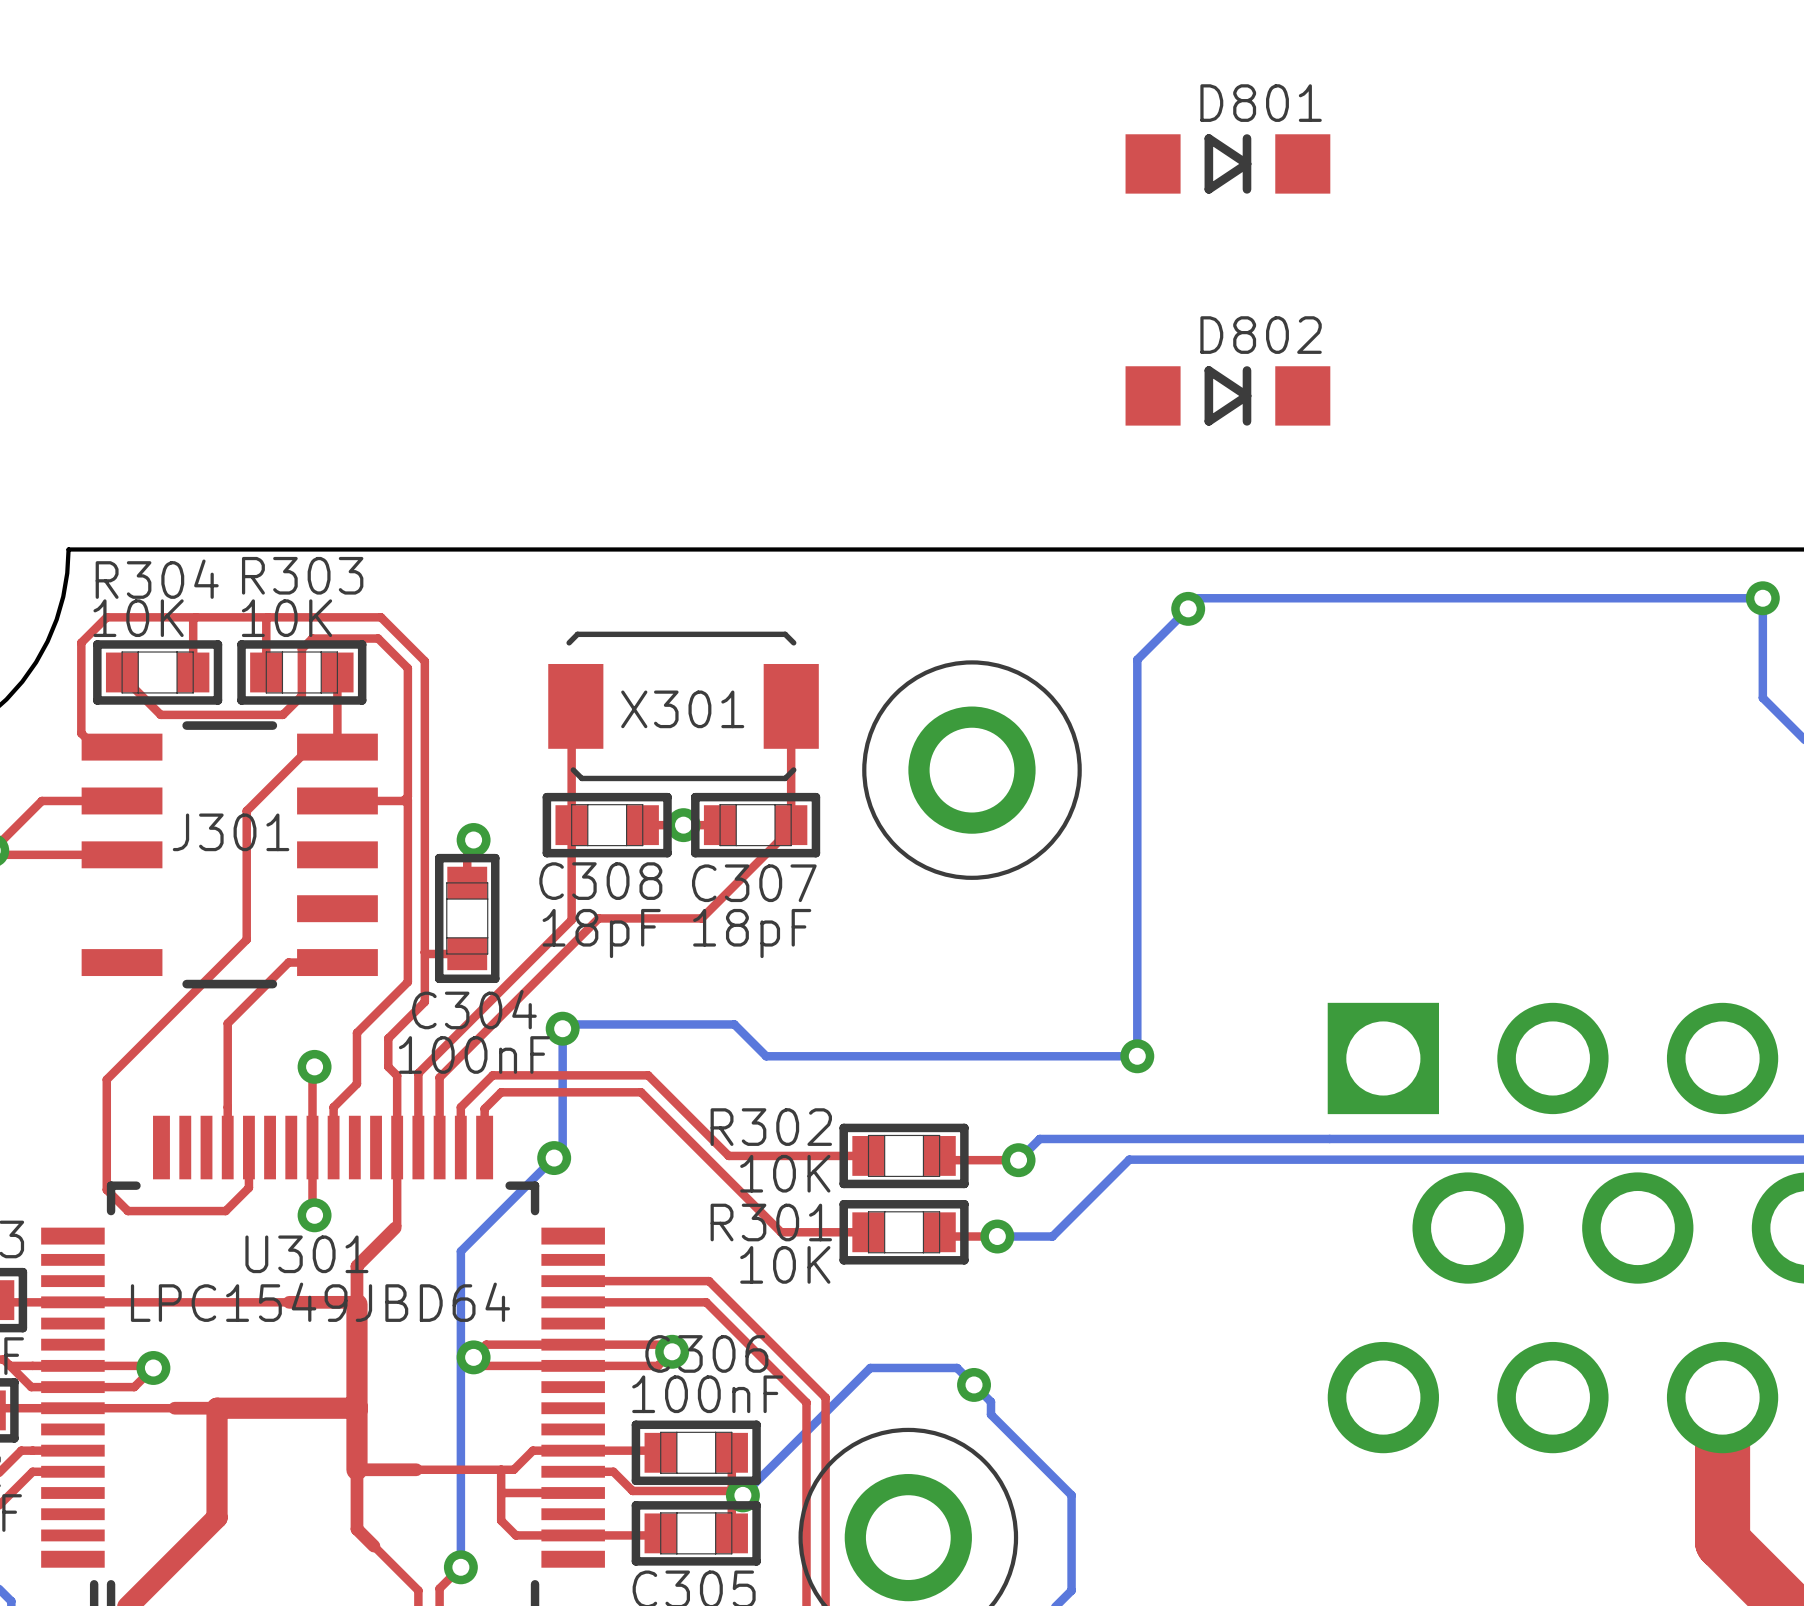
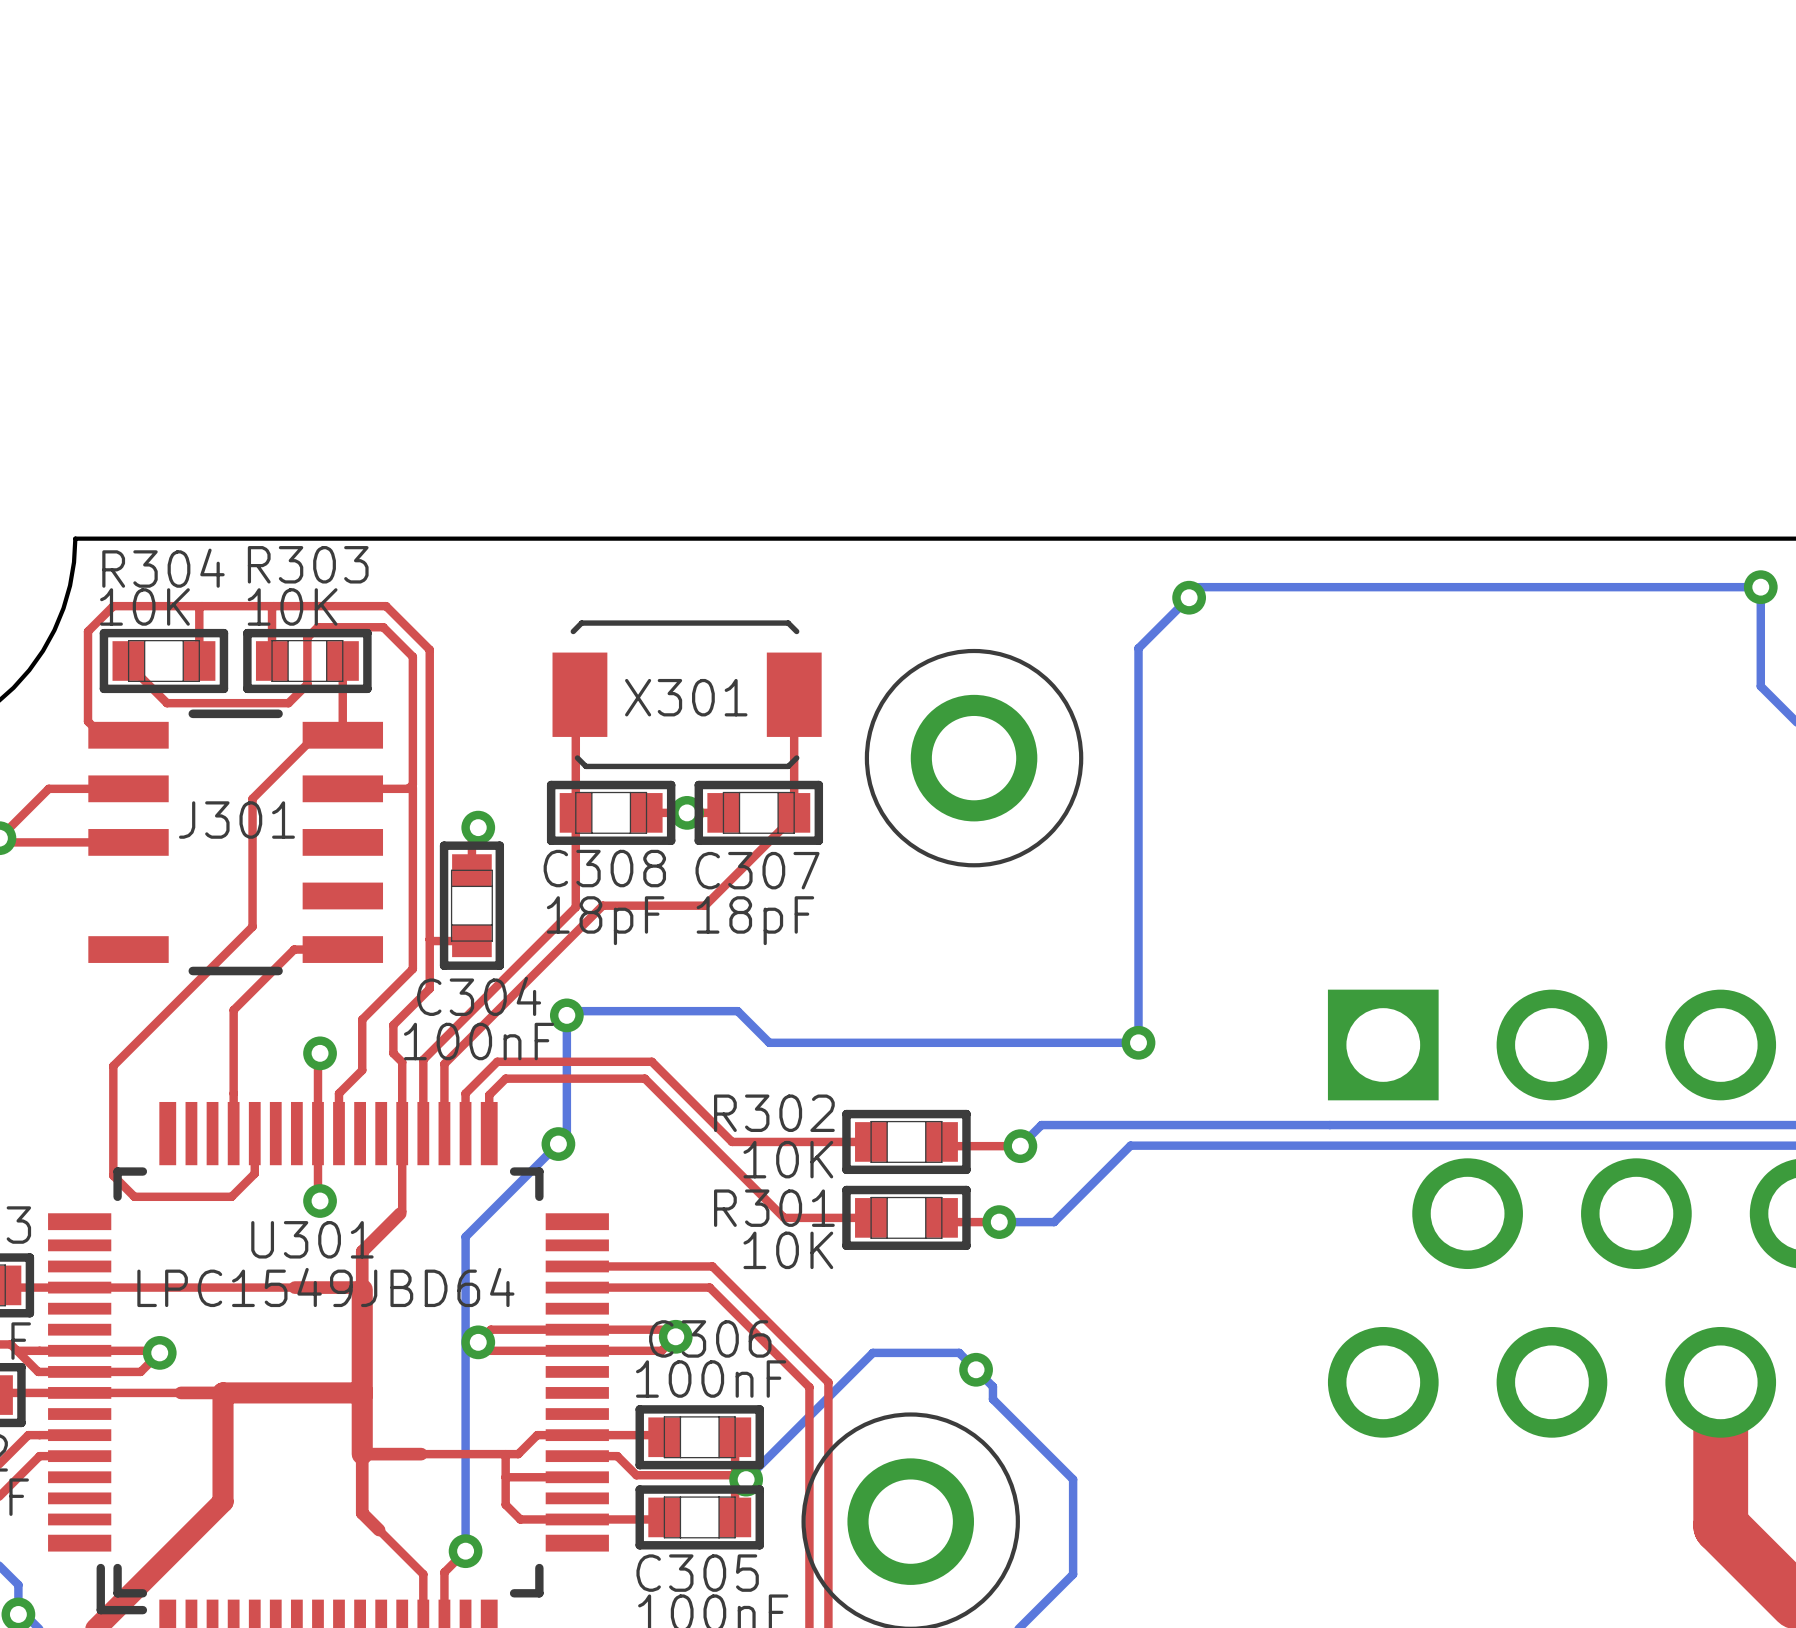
D801: (1227, 163) -> none
D802: (1227, 395) -> none

